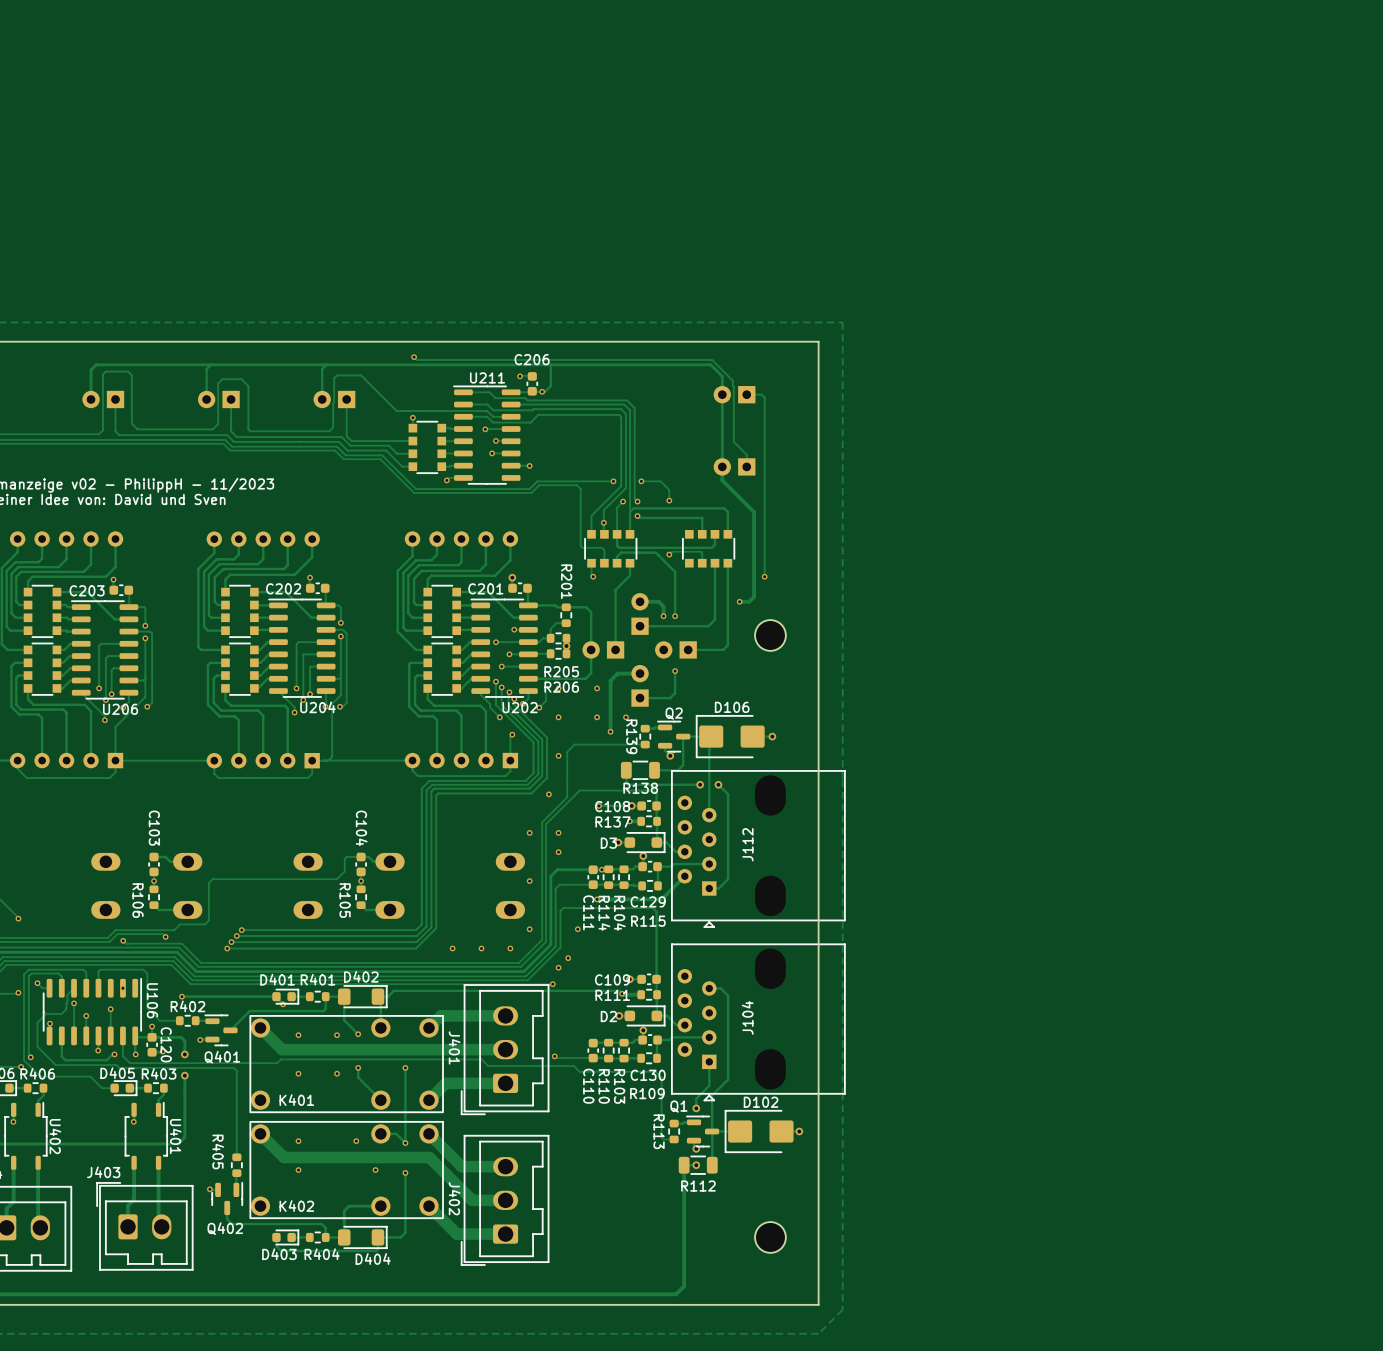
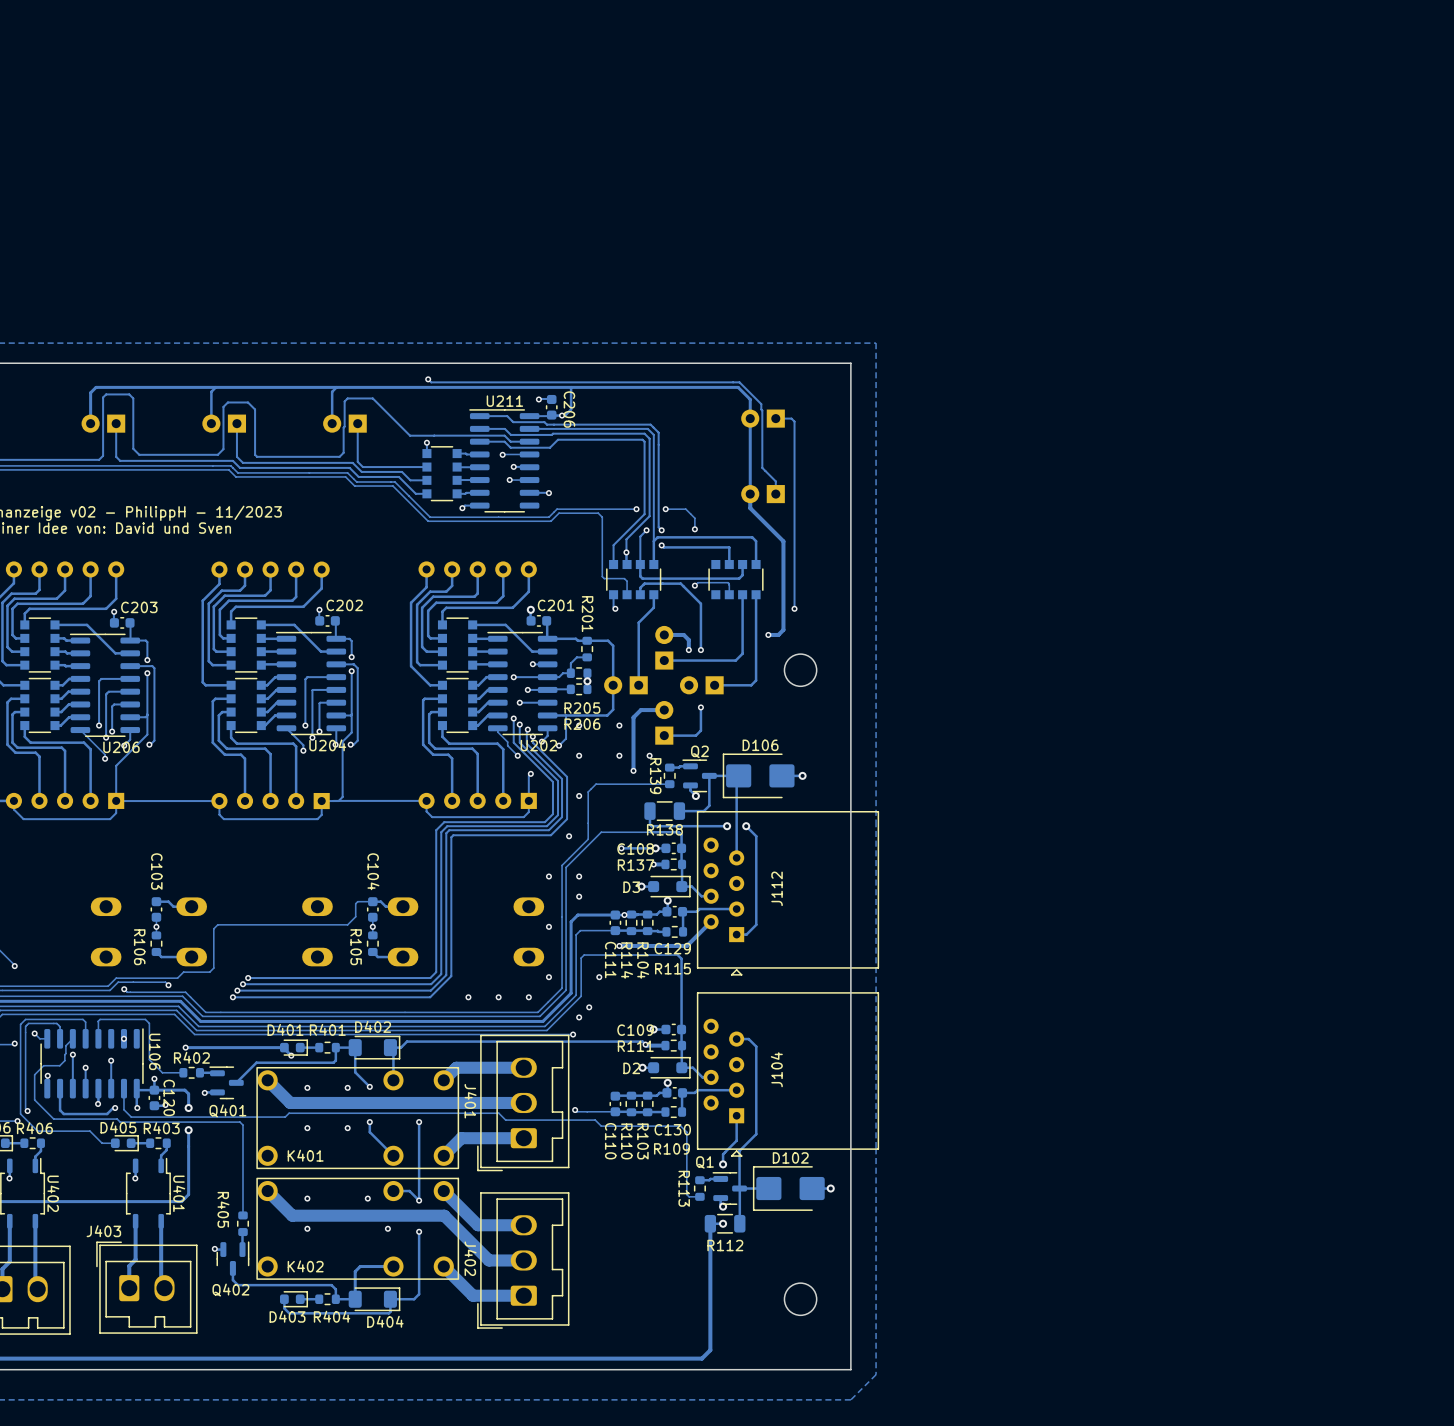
C206 name rotation: 0° (532, 359) -> 90° clockwise (569, 409)
C202 name position: C202 (283, 588) -> C202 (344, 605)
C201 name position: C201 (485, 588) -> C201 (556, 605)
C203 name position: C203 (87, 590) -> C203 (139, 607)

